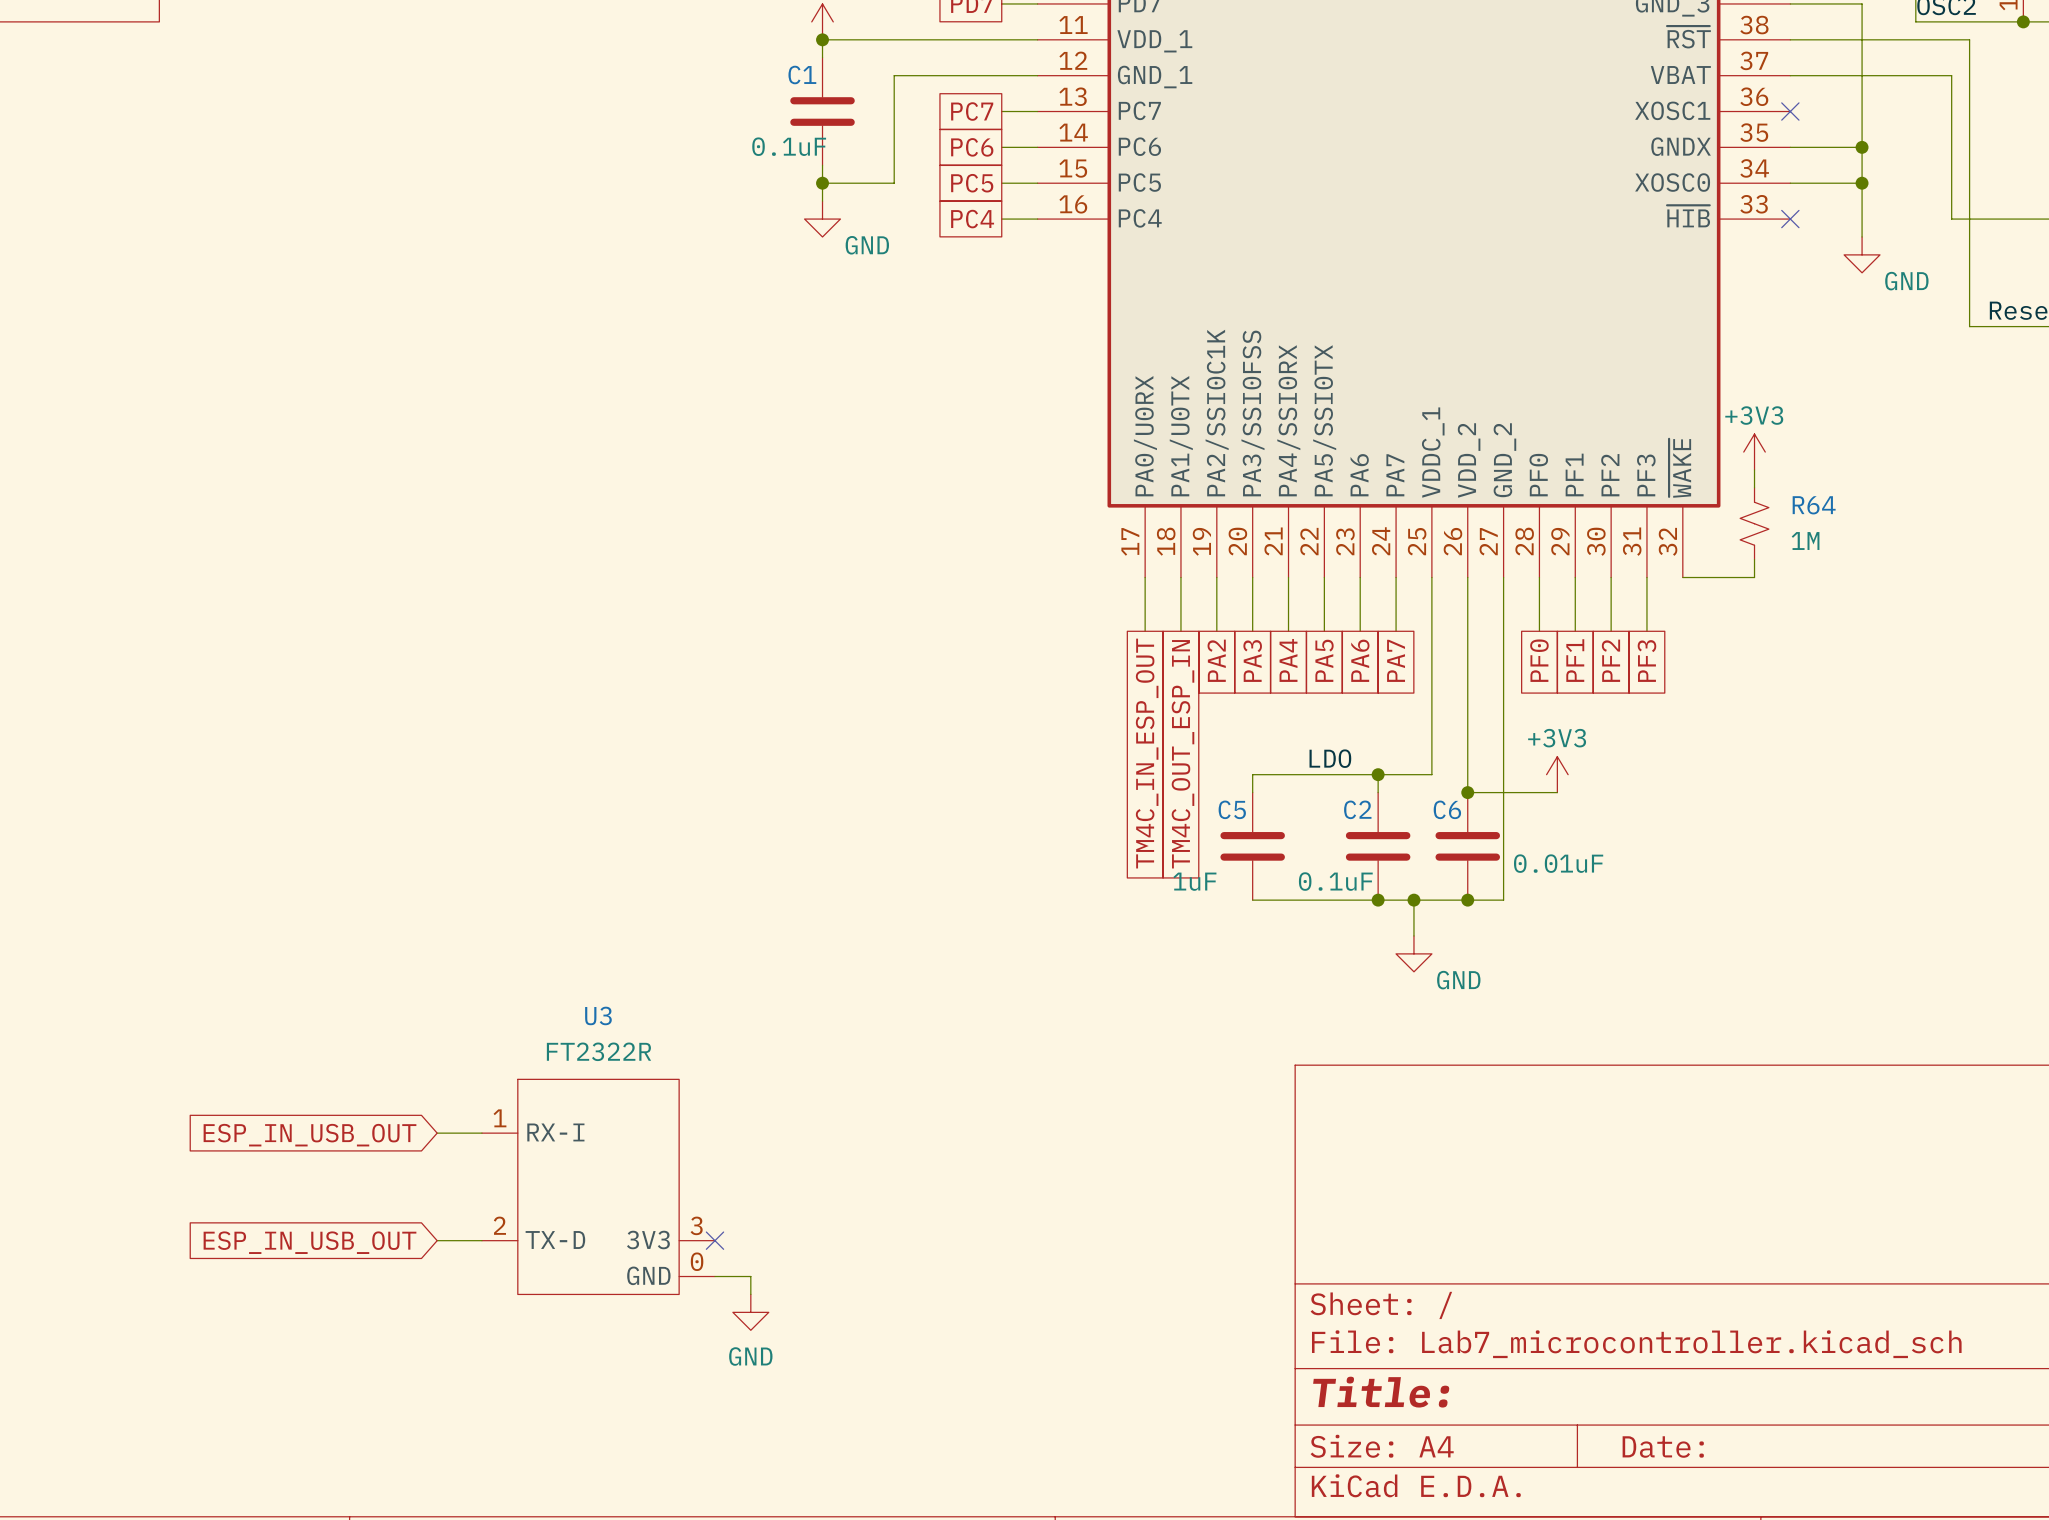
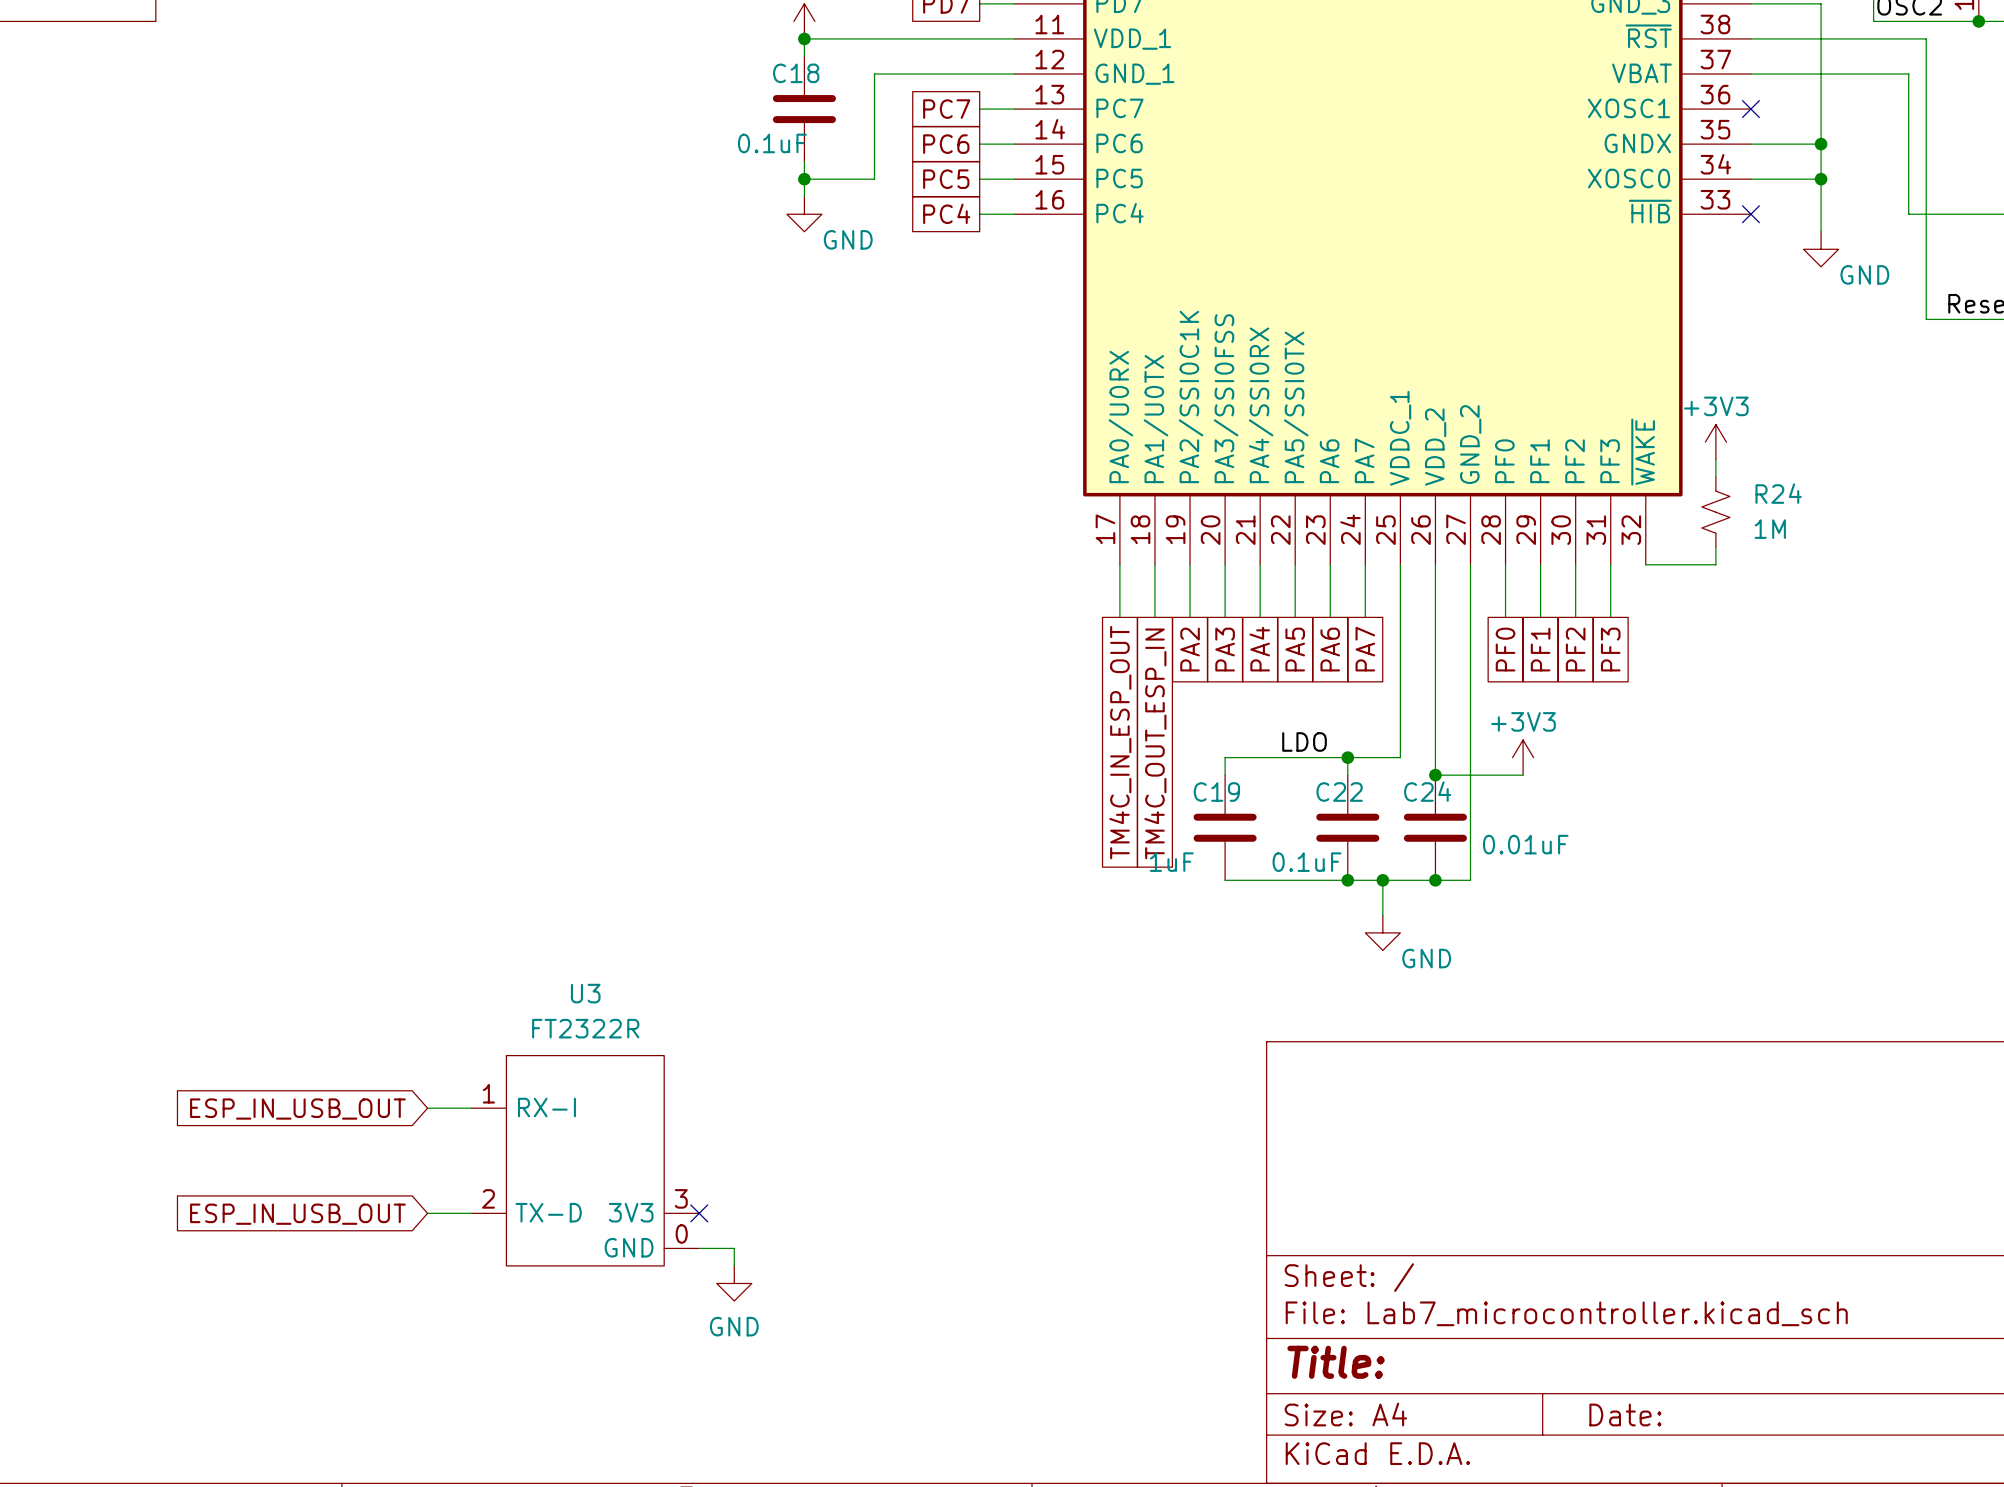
C1 name: C1 (802, 75) -> C18 (796, 73)
R64 name: R64 (1814, 505) -> R24 (1778, 493)
C5 name: C5 (1232, 809) -> C19 (1216, 792)
C2 name: C2 (1357, 809) -> C22 (1339, 792)
C6 name: C6 (1447, 809) -> C24 (1427, 791)

